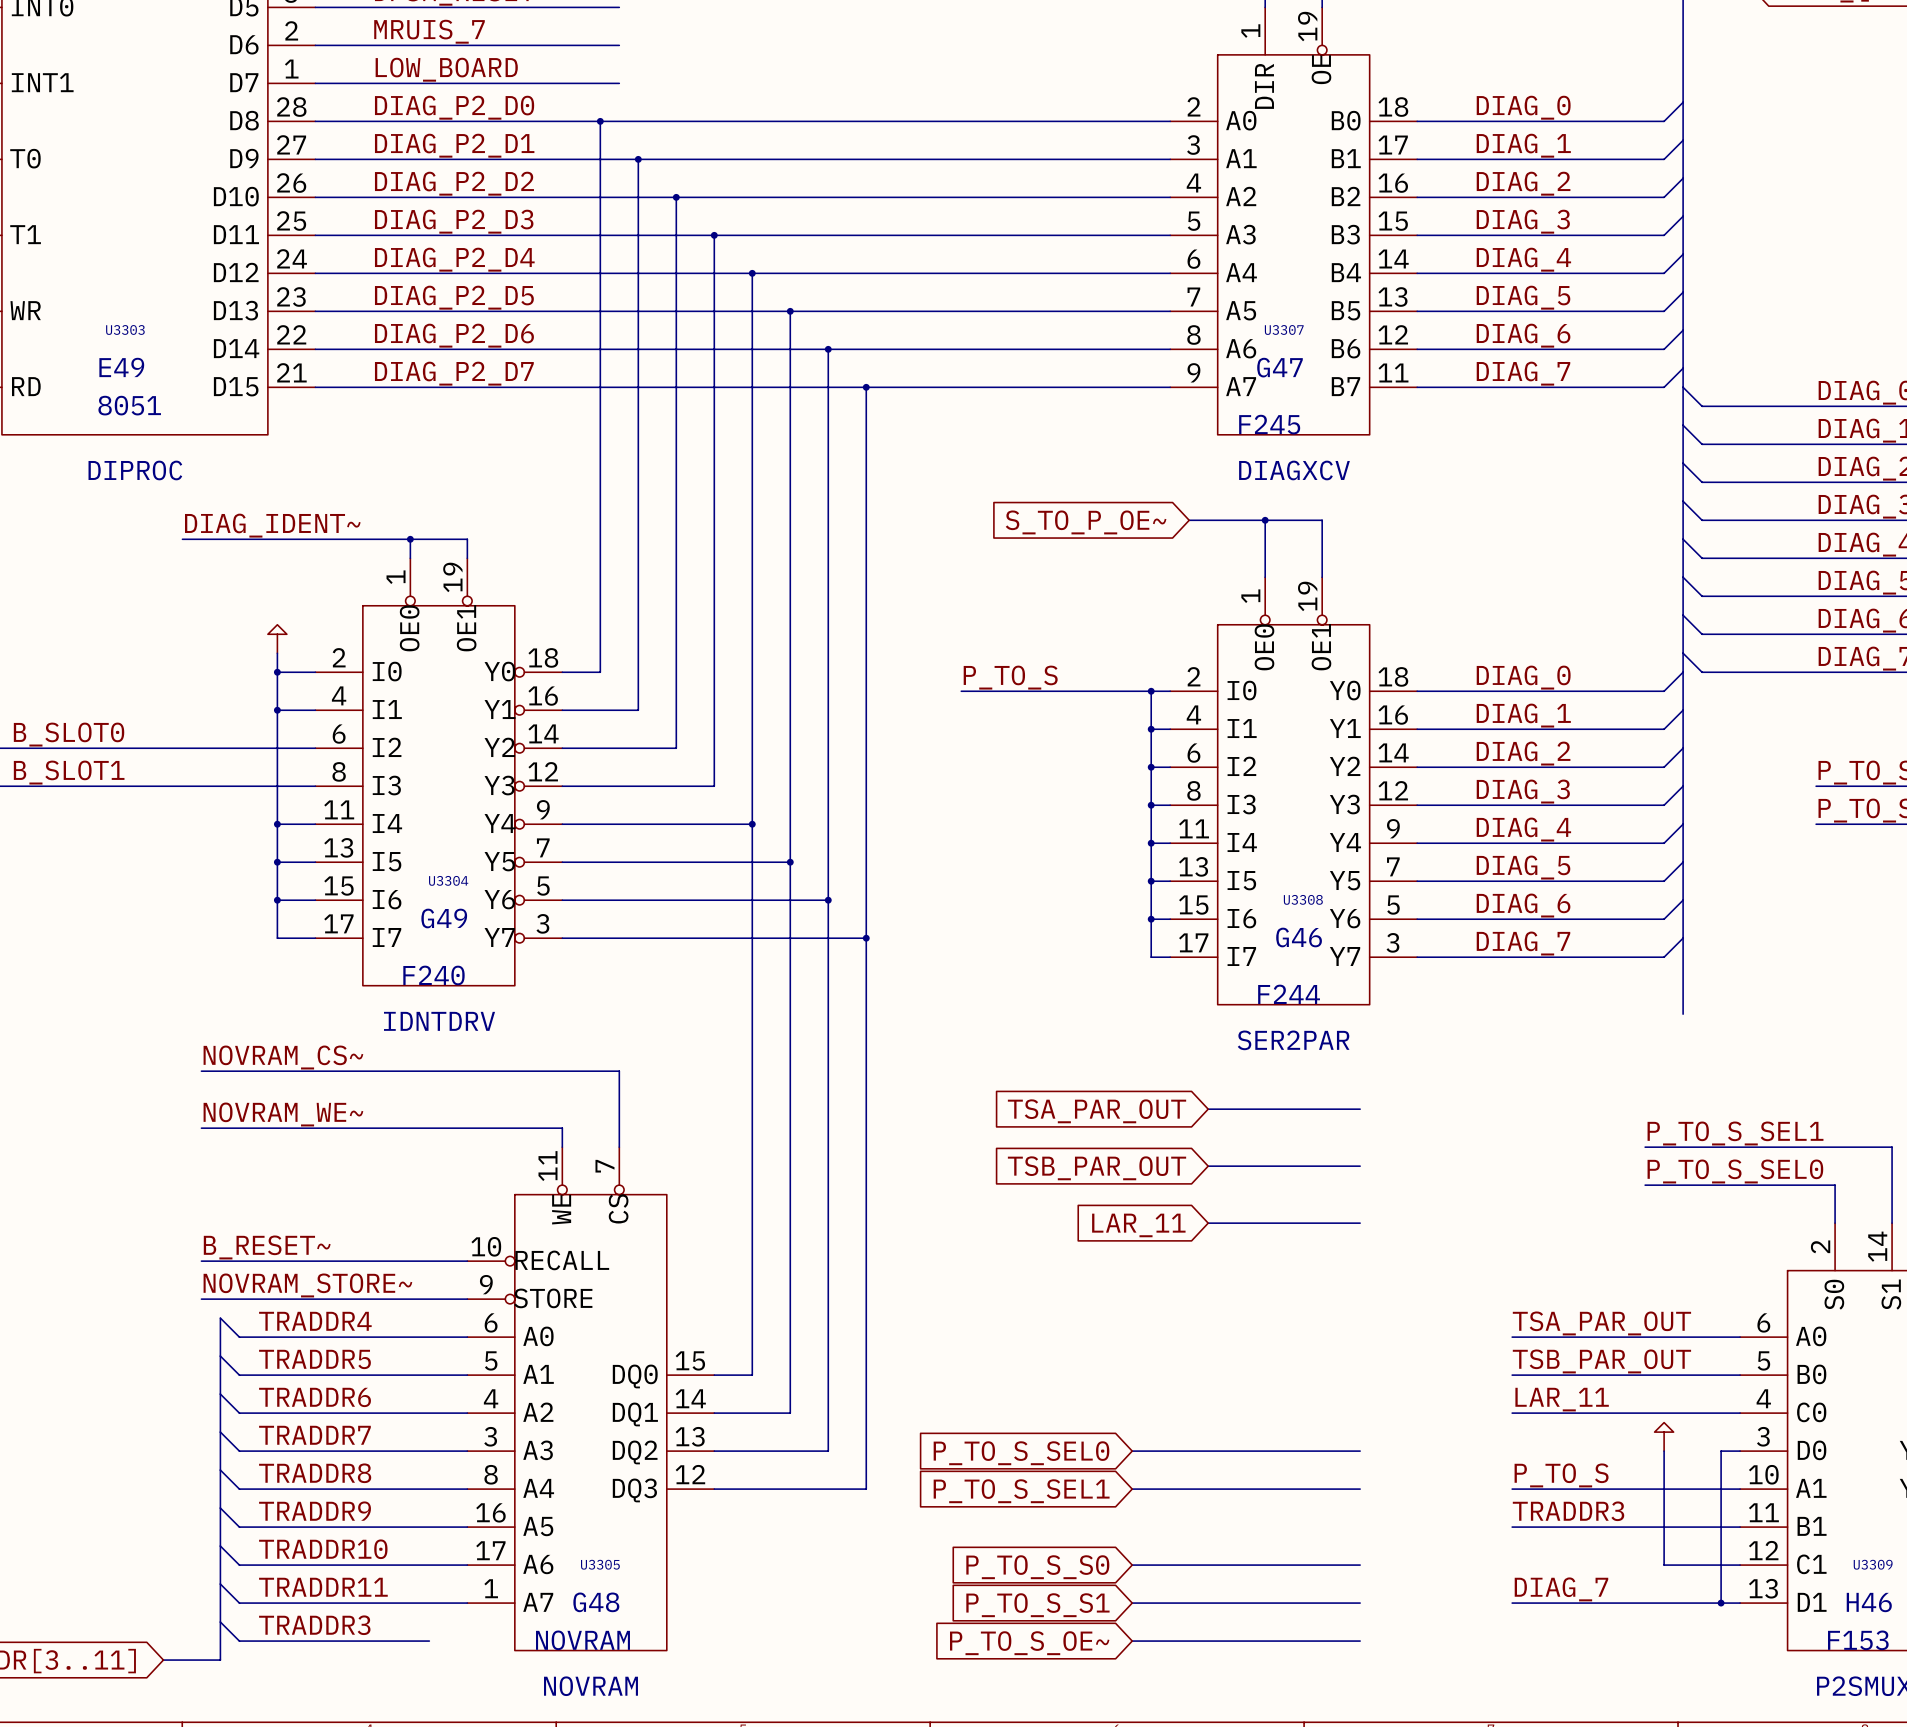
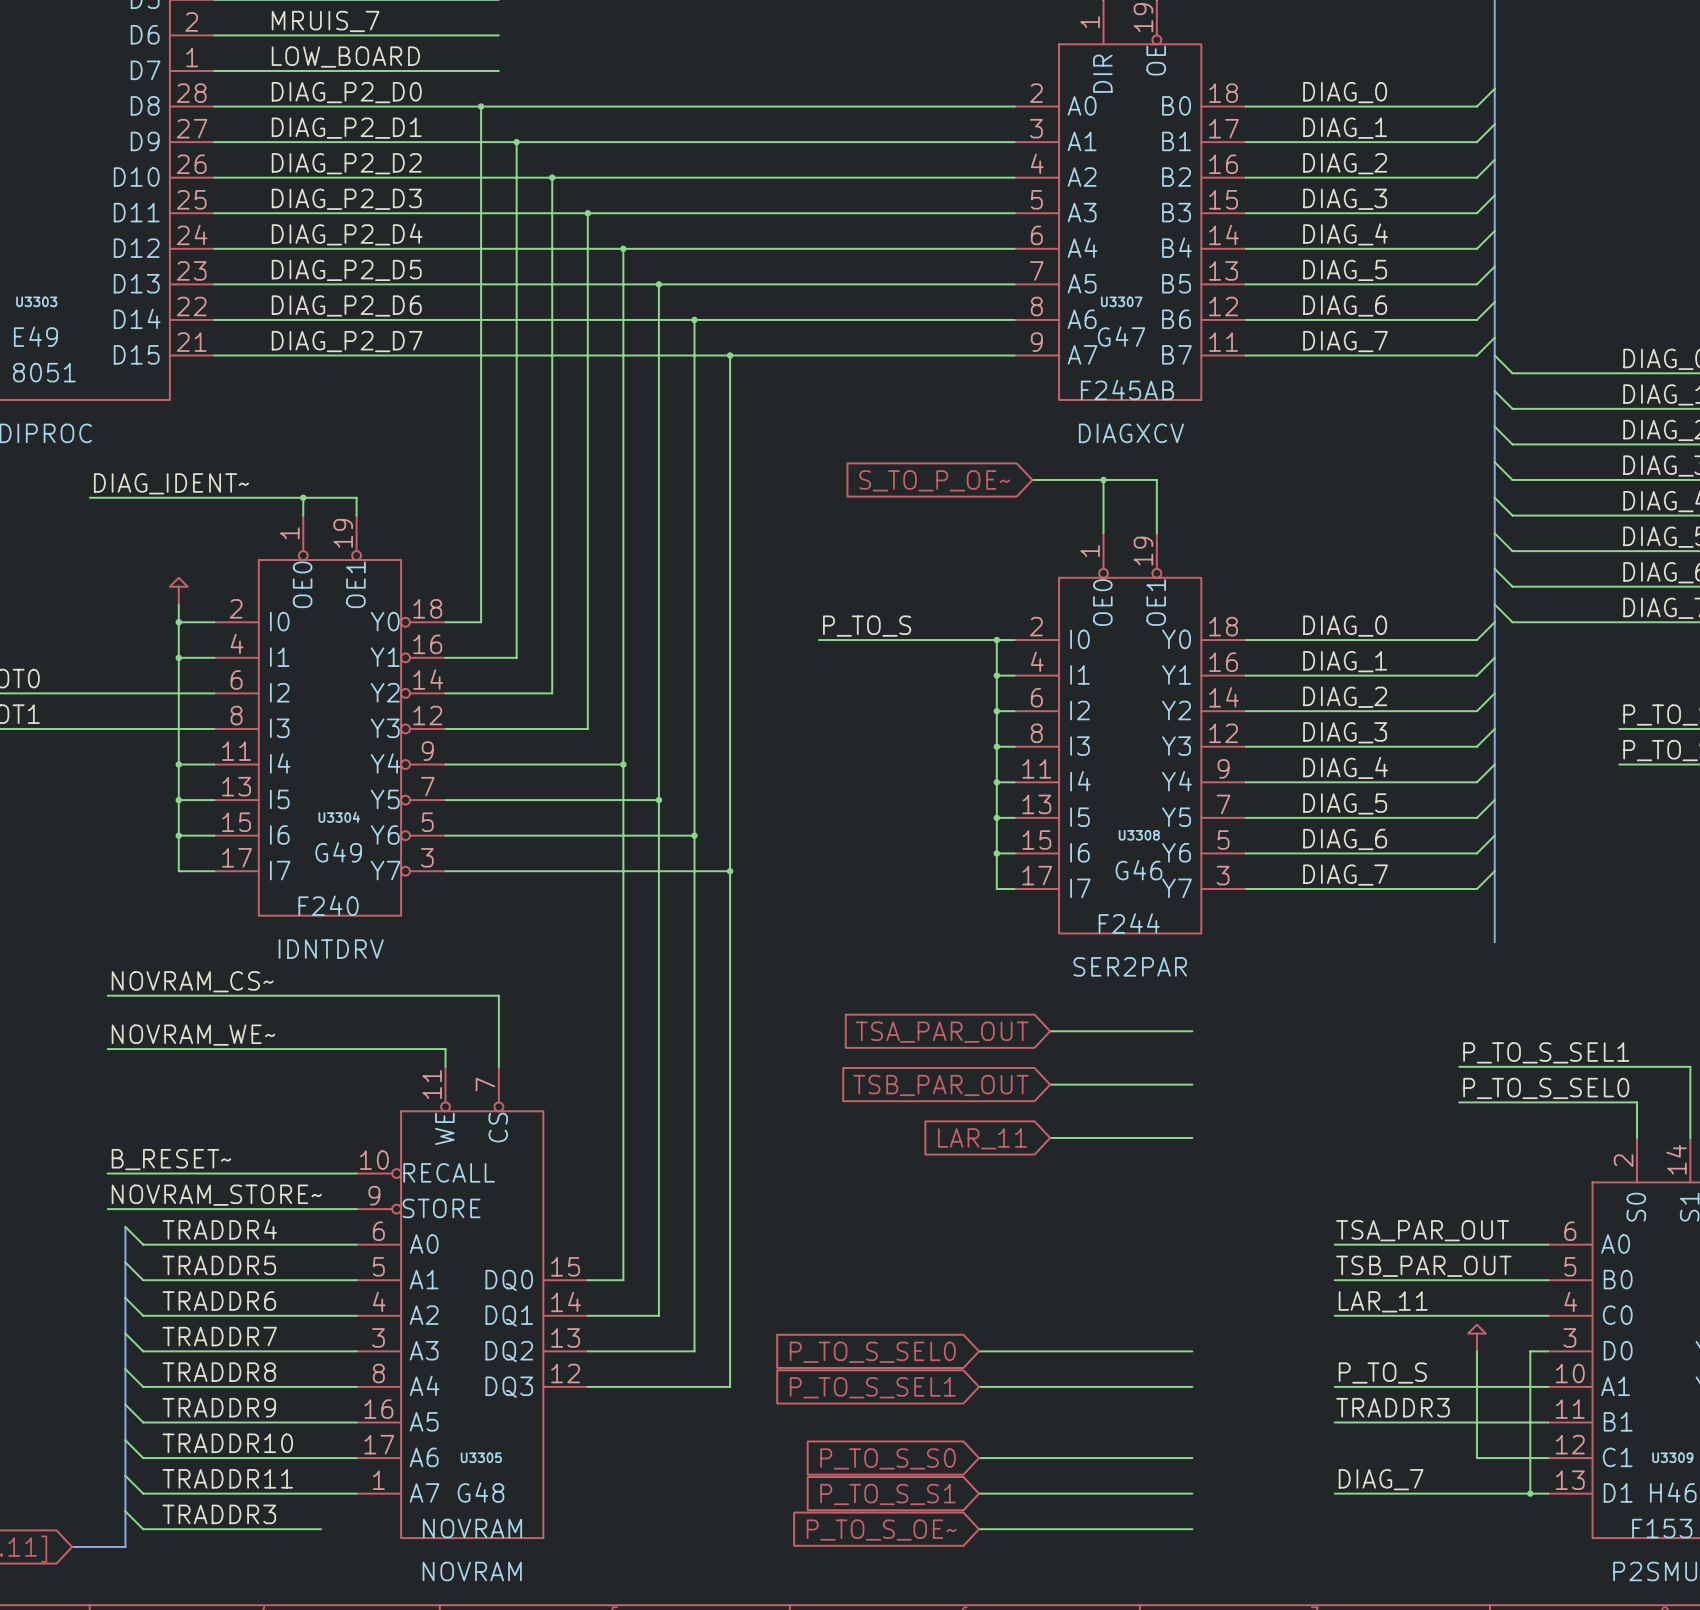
U3307 value: F245 (1269, 424) -> F245AB (1127, 389)

